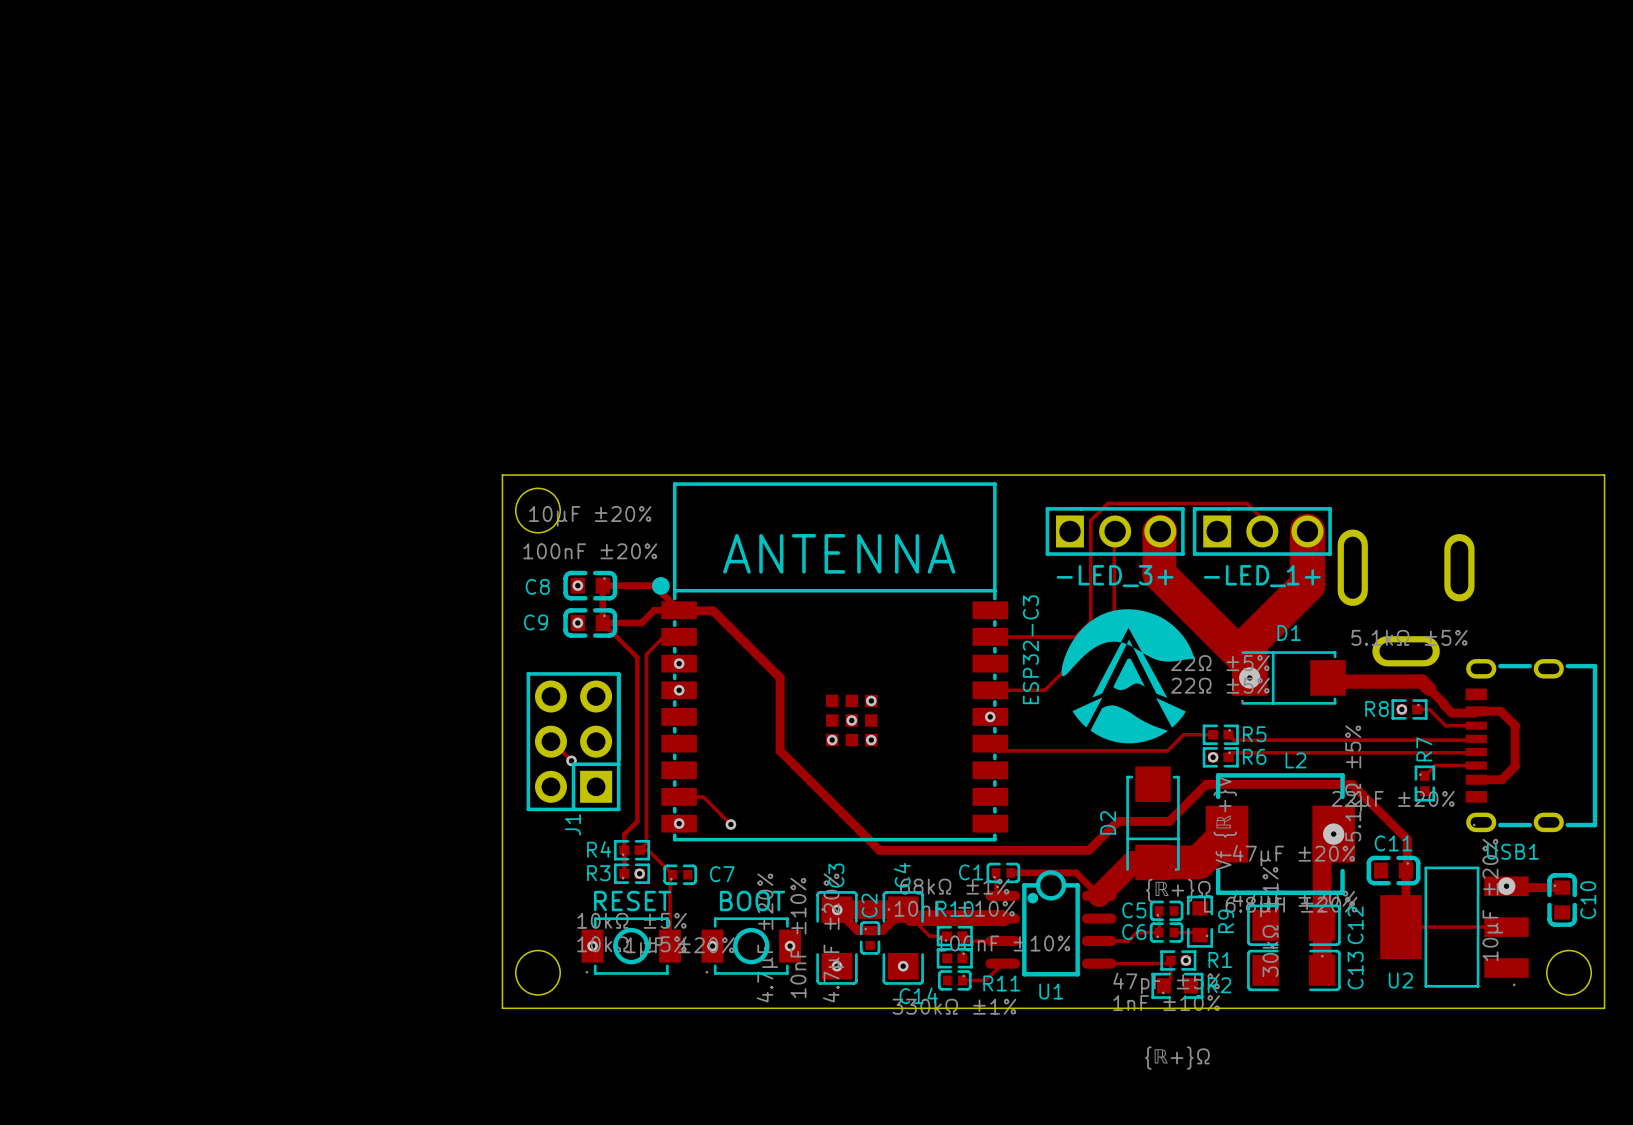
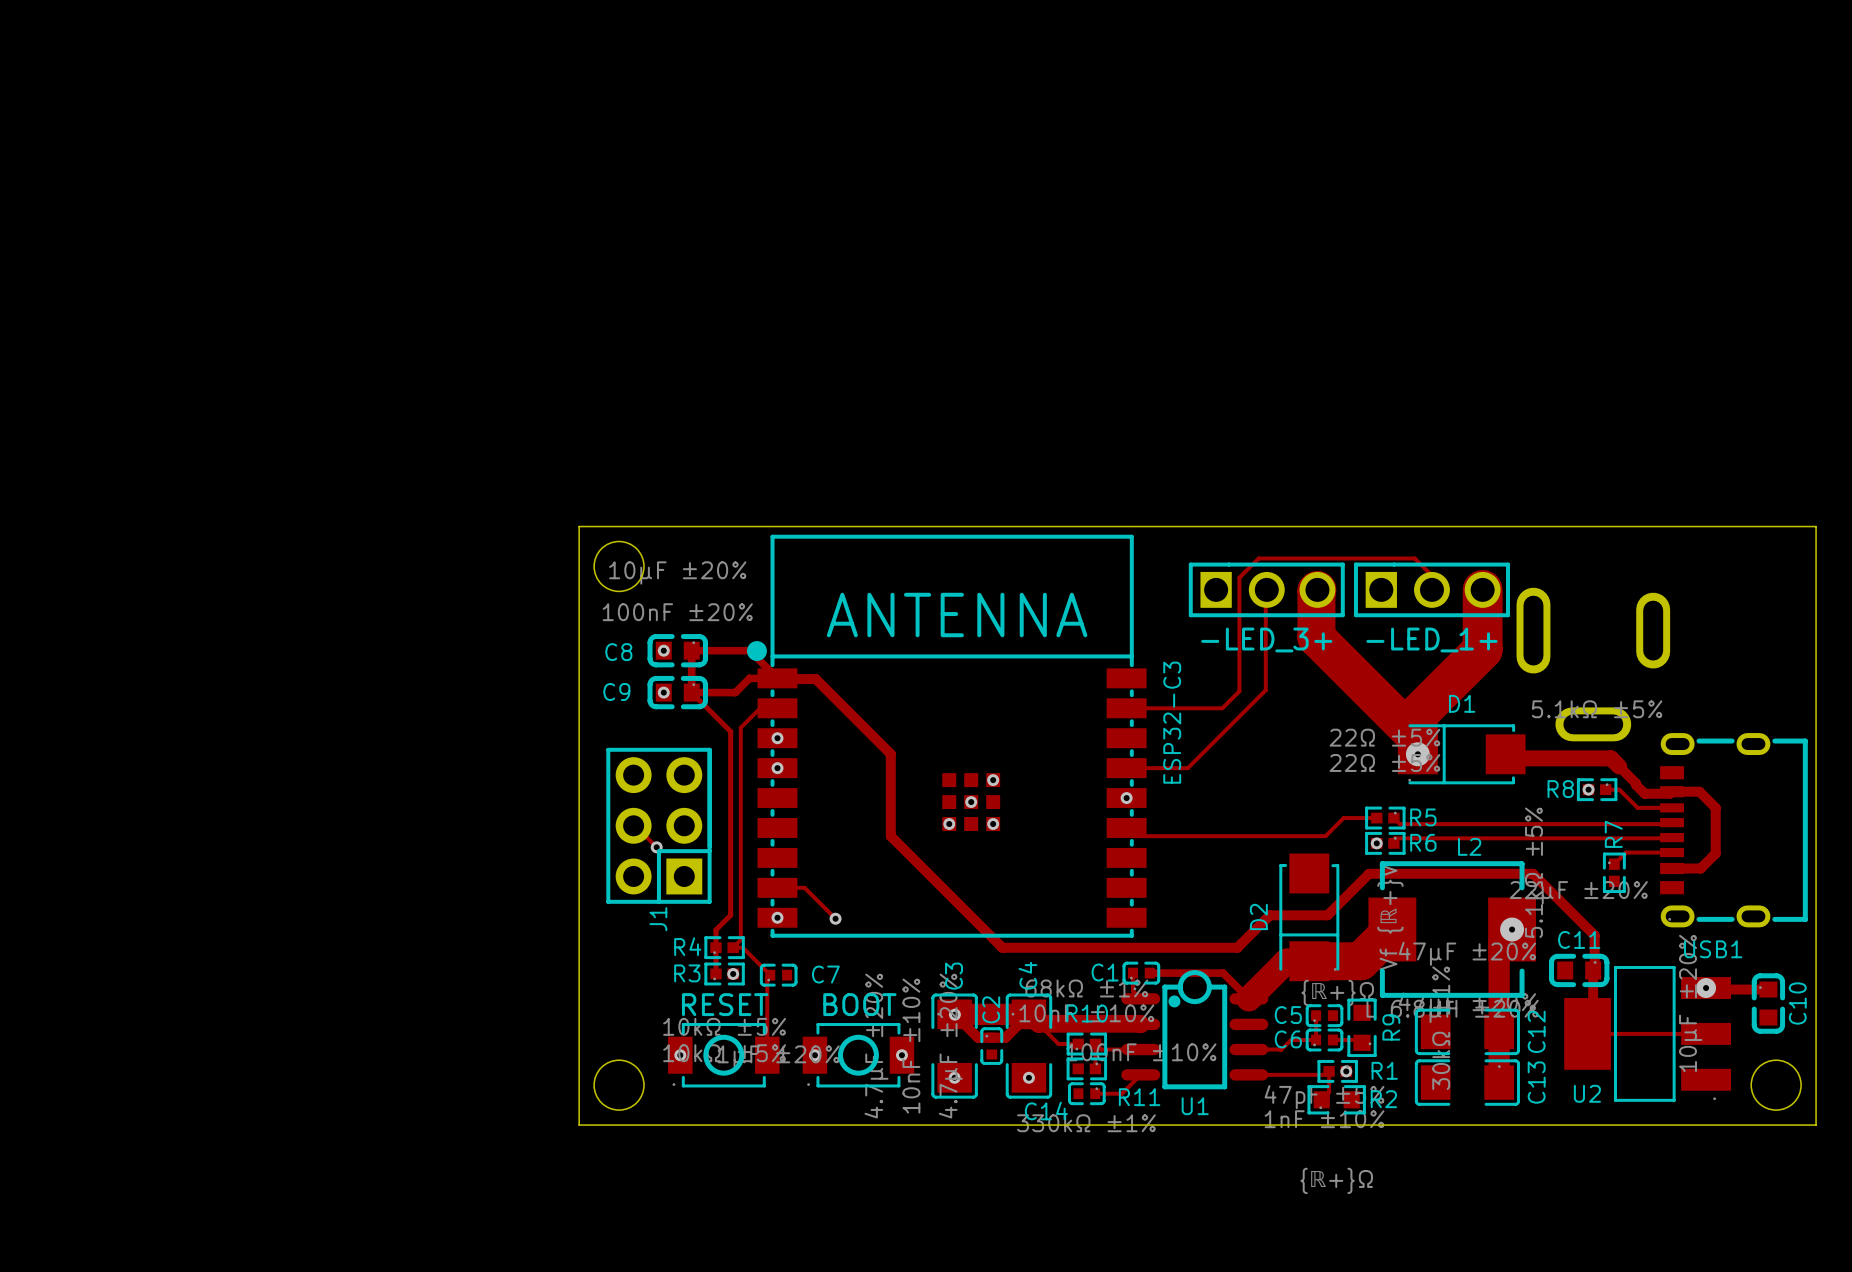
drawing: [1061, 609, 1195, 744] -> none

